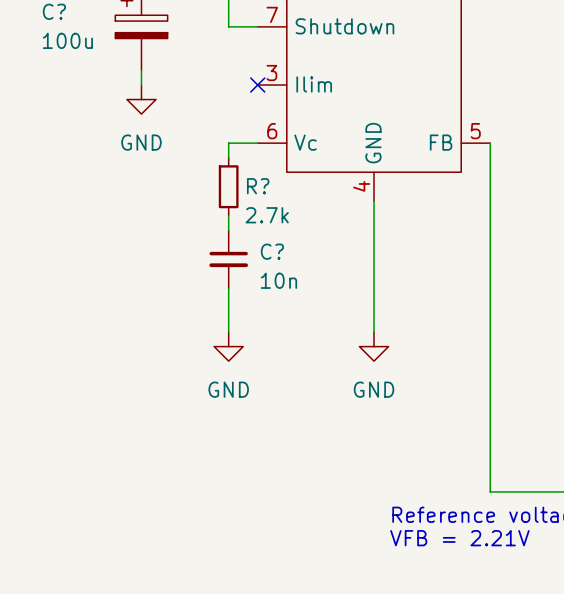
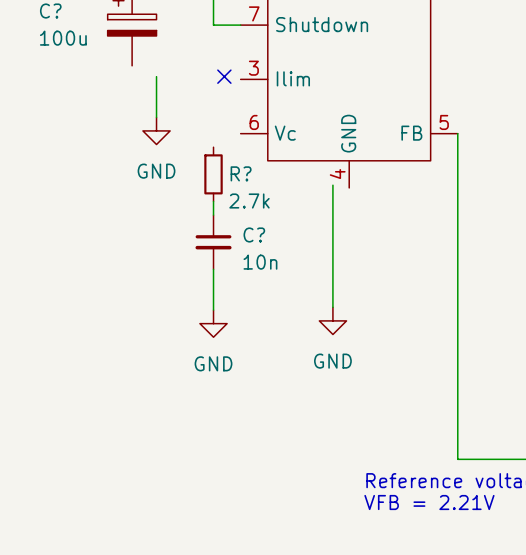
wire: (141, 70) (141, 85) -> none
wire: none -> (156, 76) (156, 117)
no-connect mark position: (257, 85) -> (224, 76)
power symbol position: GND (141, 99) -> GND (156, 130)
wire: (257, 143) (228, 143) (228, 157) -> none
wire: (374, 201) (374, 332) -> (332, 185) (332, 307)
power symbol position: GND (374, 346) -> GND (332, 320)

